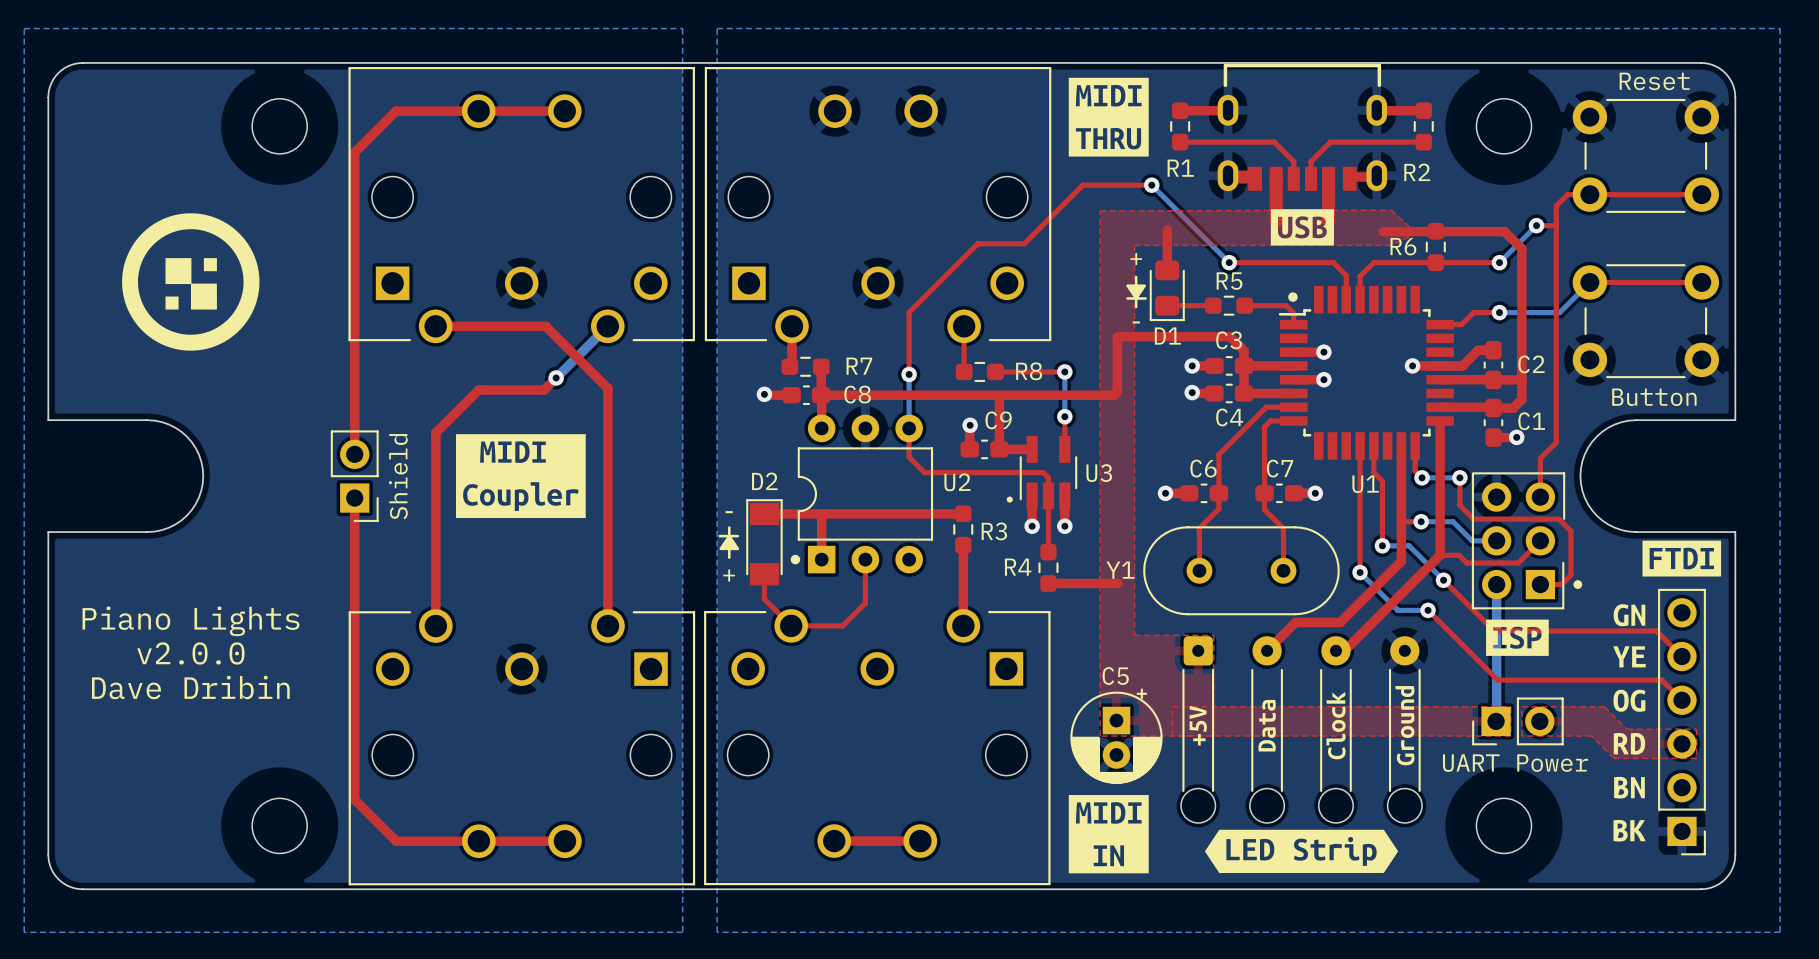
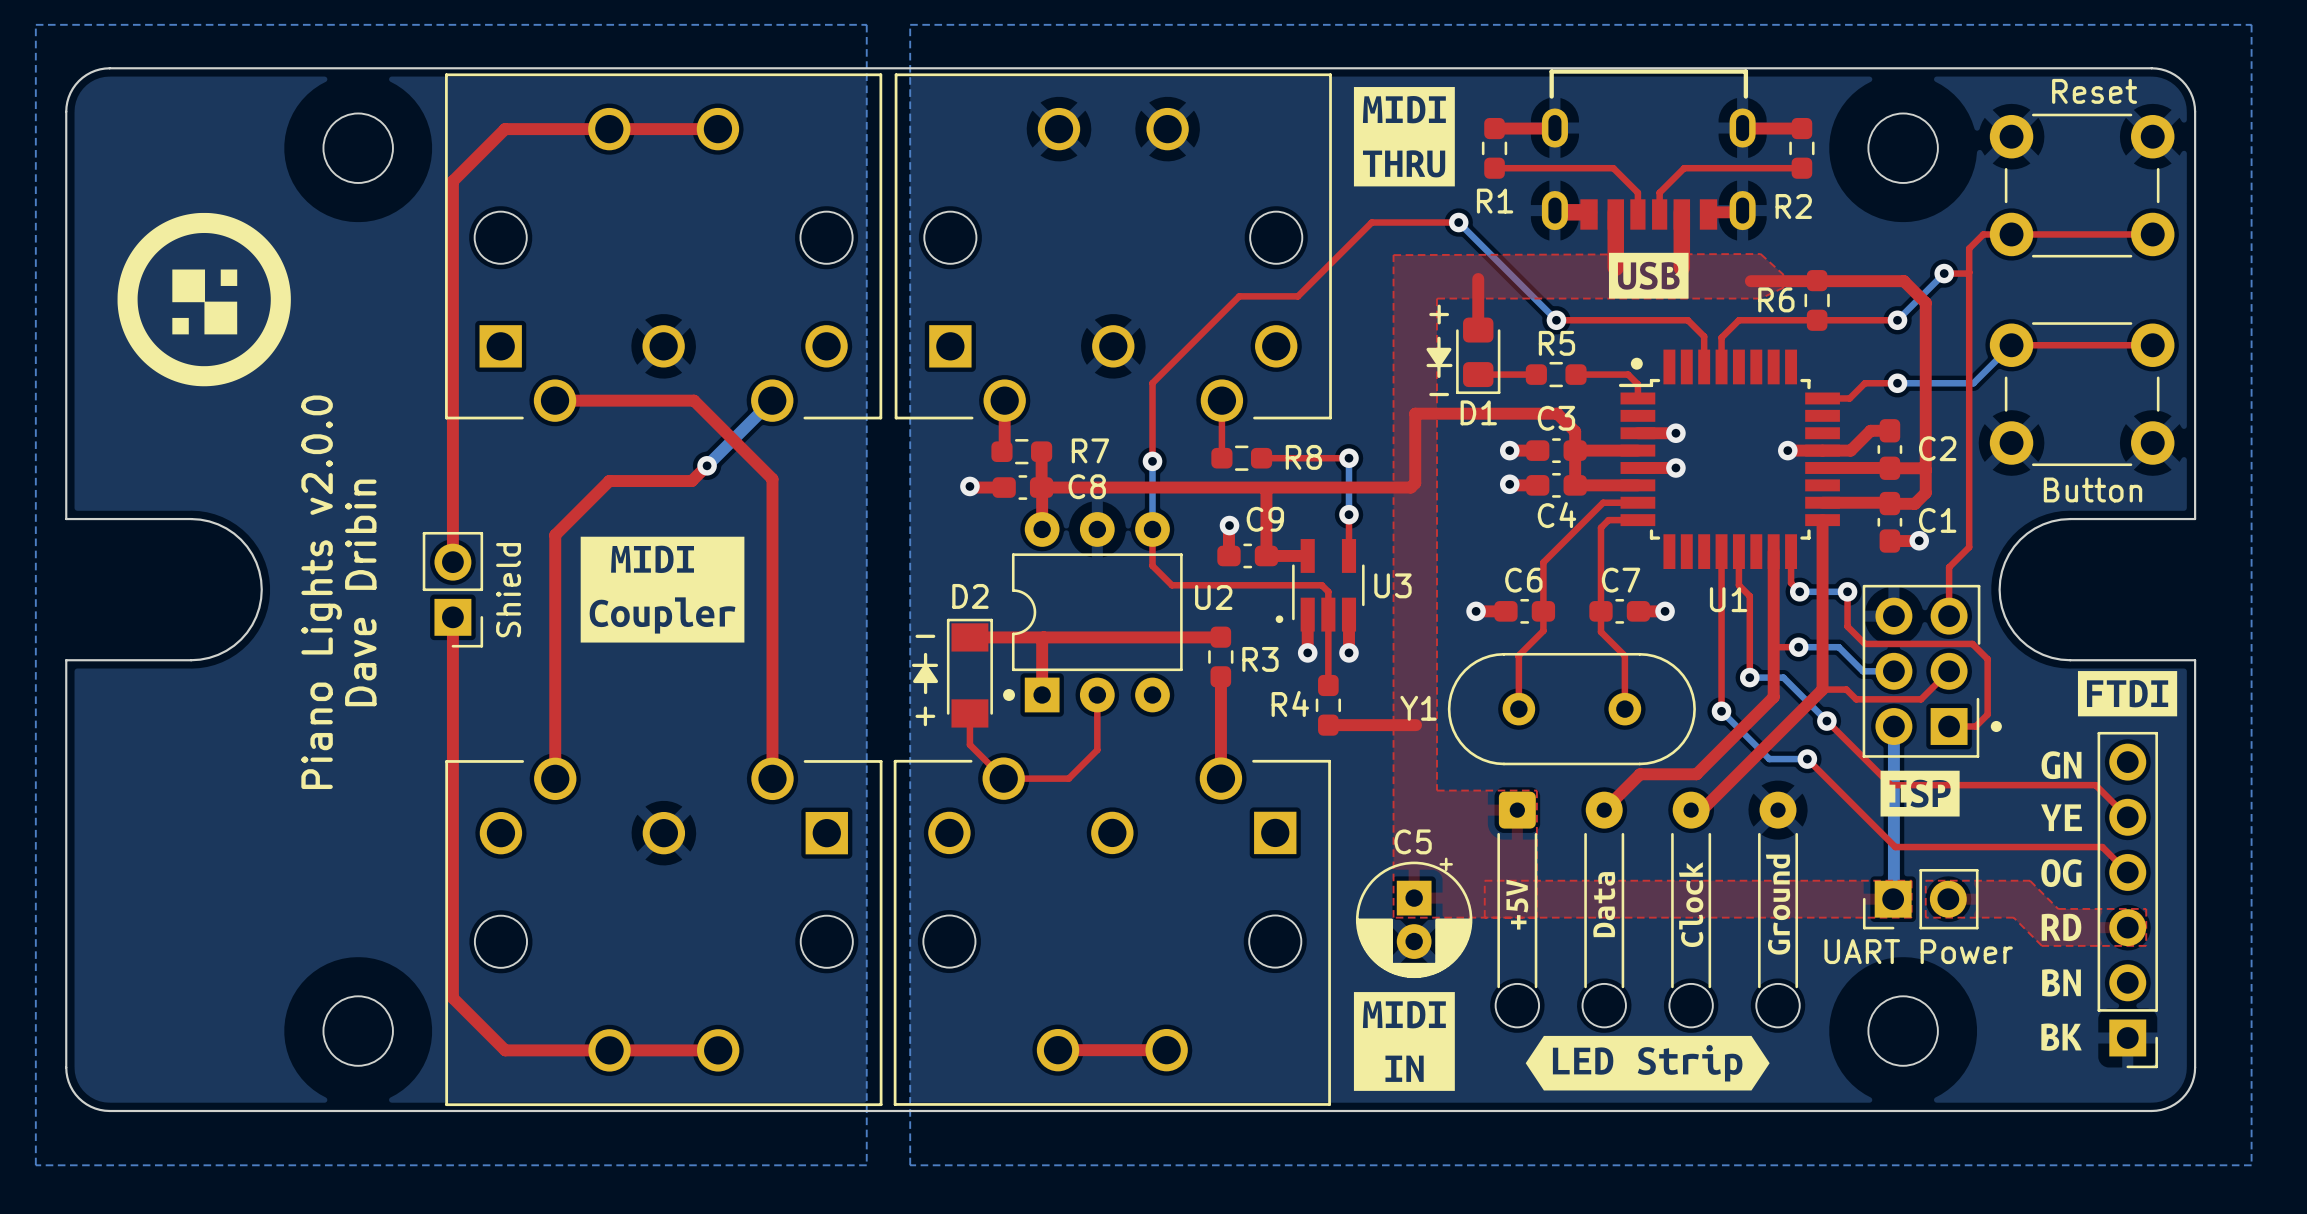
drawing position: (190, 281) -> (204, 299)
text: Piano Lights (190, 621) -> Piano Lights v2.0.0 (321, 592)
text: v2.0.0 (190, 653) -> none
text rotation: 0° (190, 687) -> 90° counterclockwise (360, 592)

